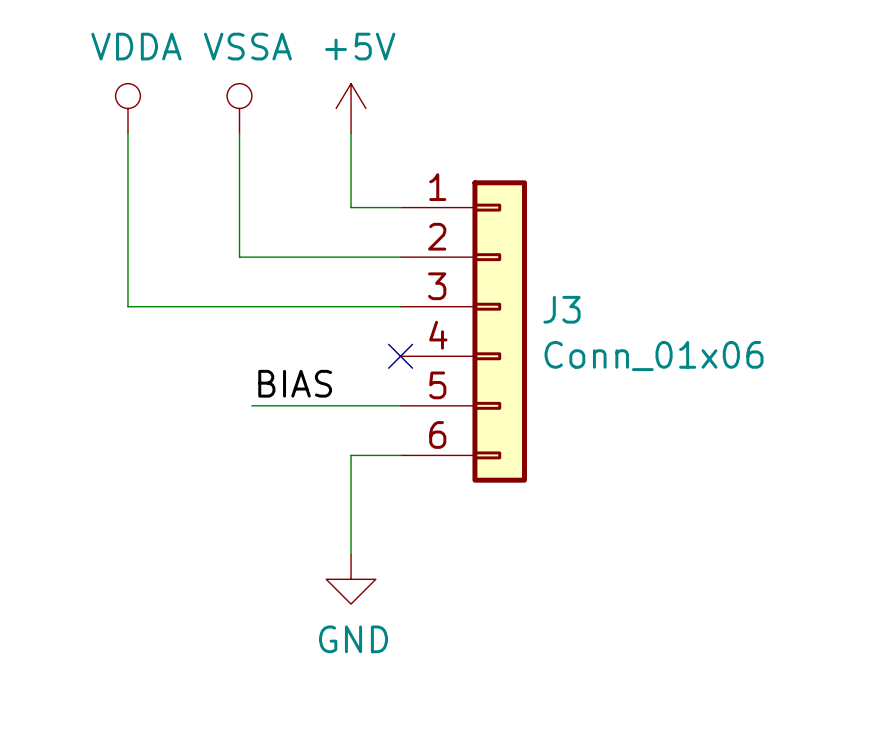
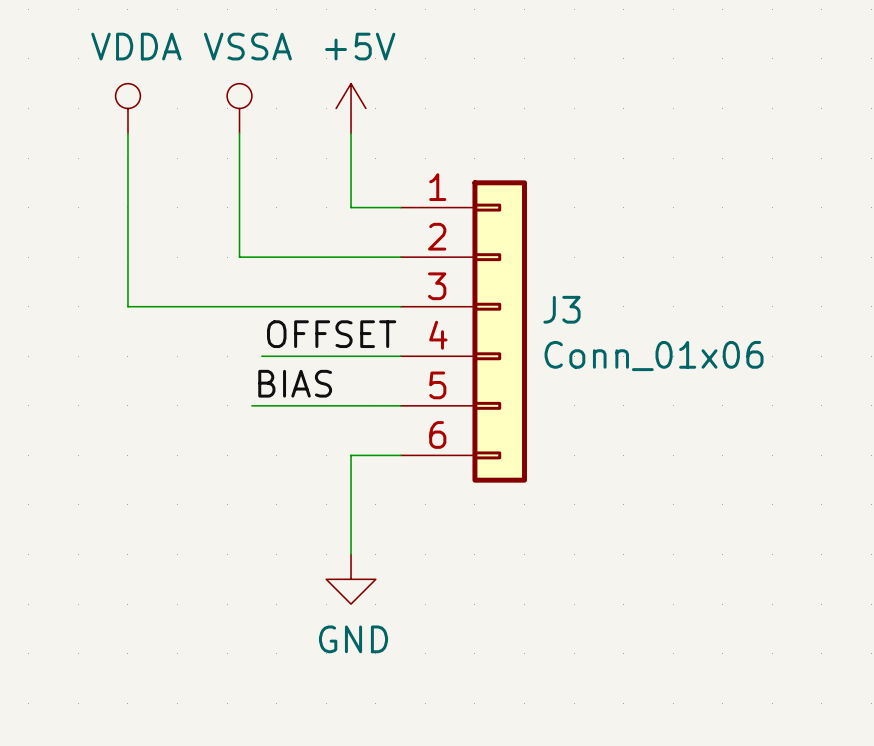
label: none -> OFFSET (331, 334)
wire: none -> (261, 356) (400, 356)
no-connect mark: (400, 356) -> none

